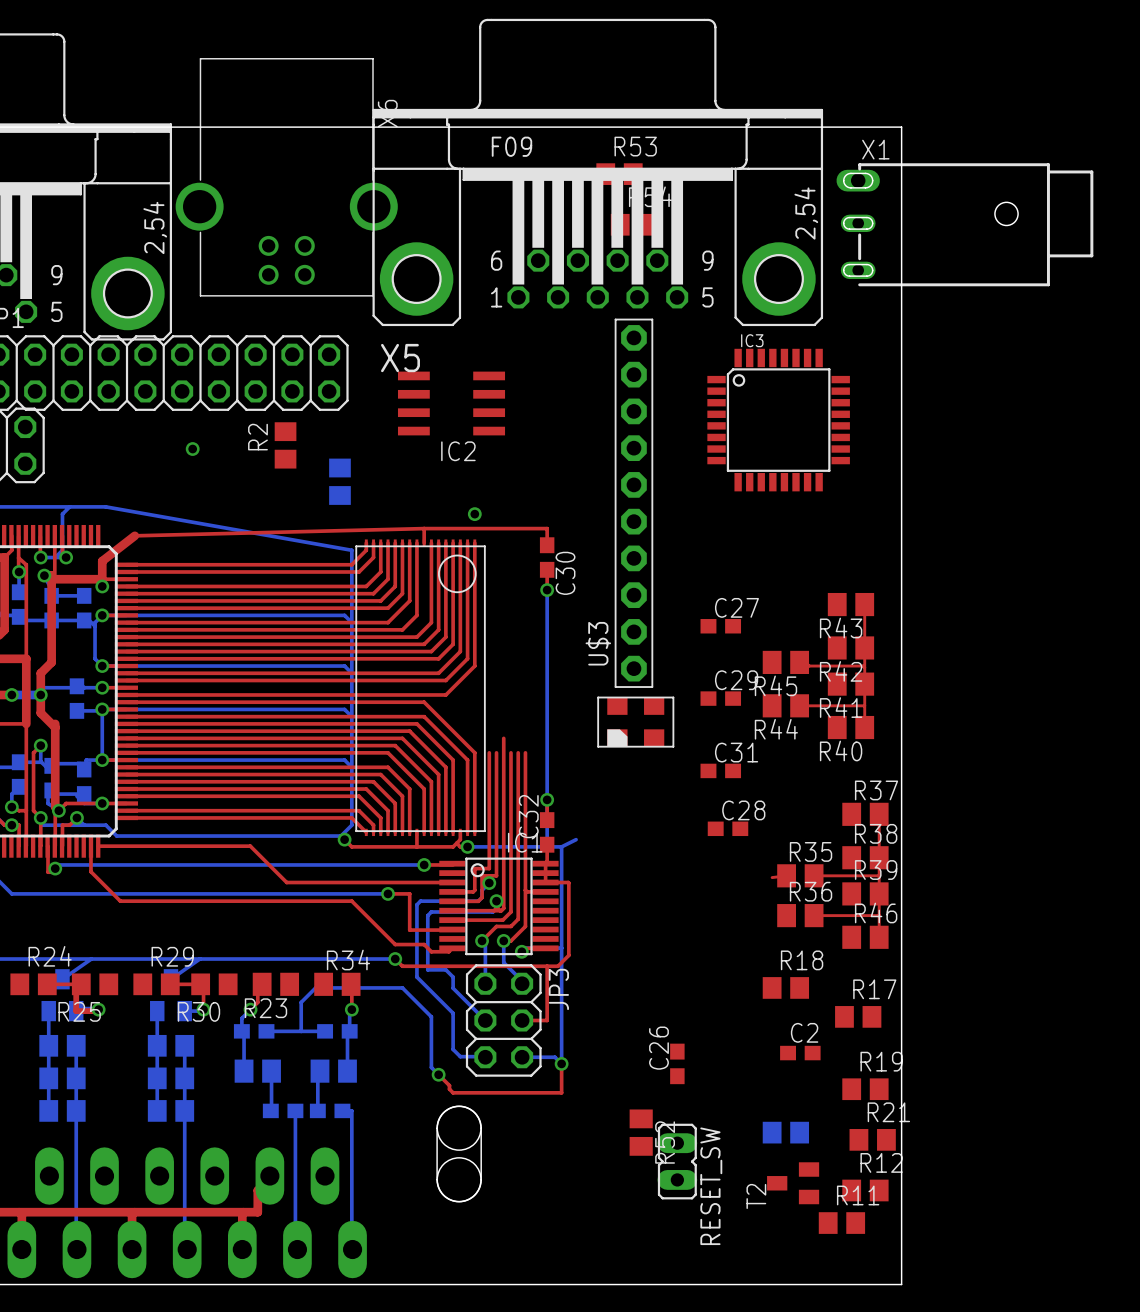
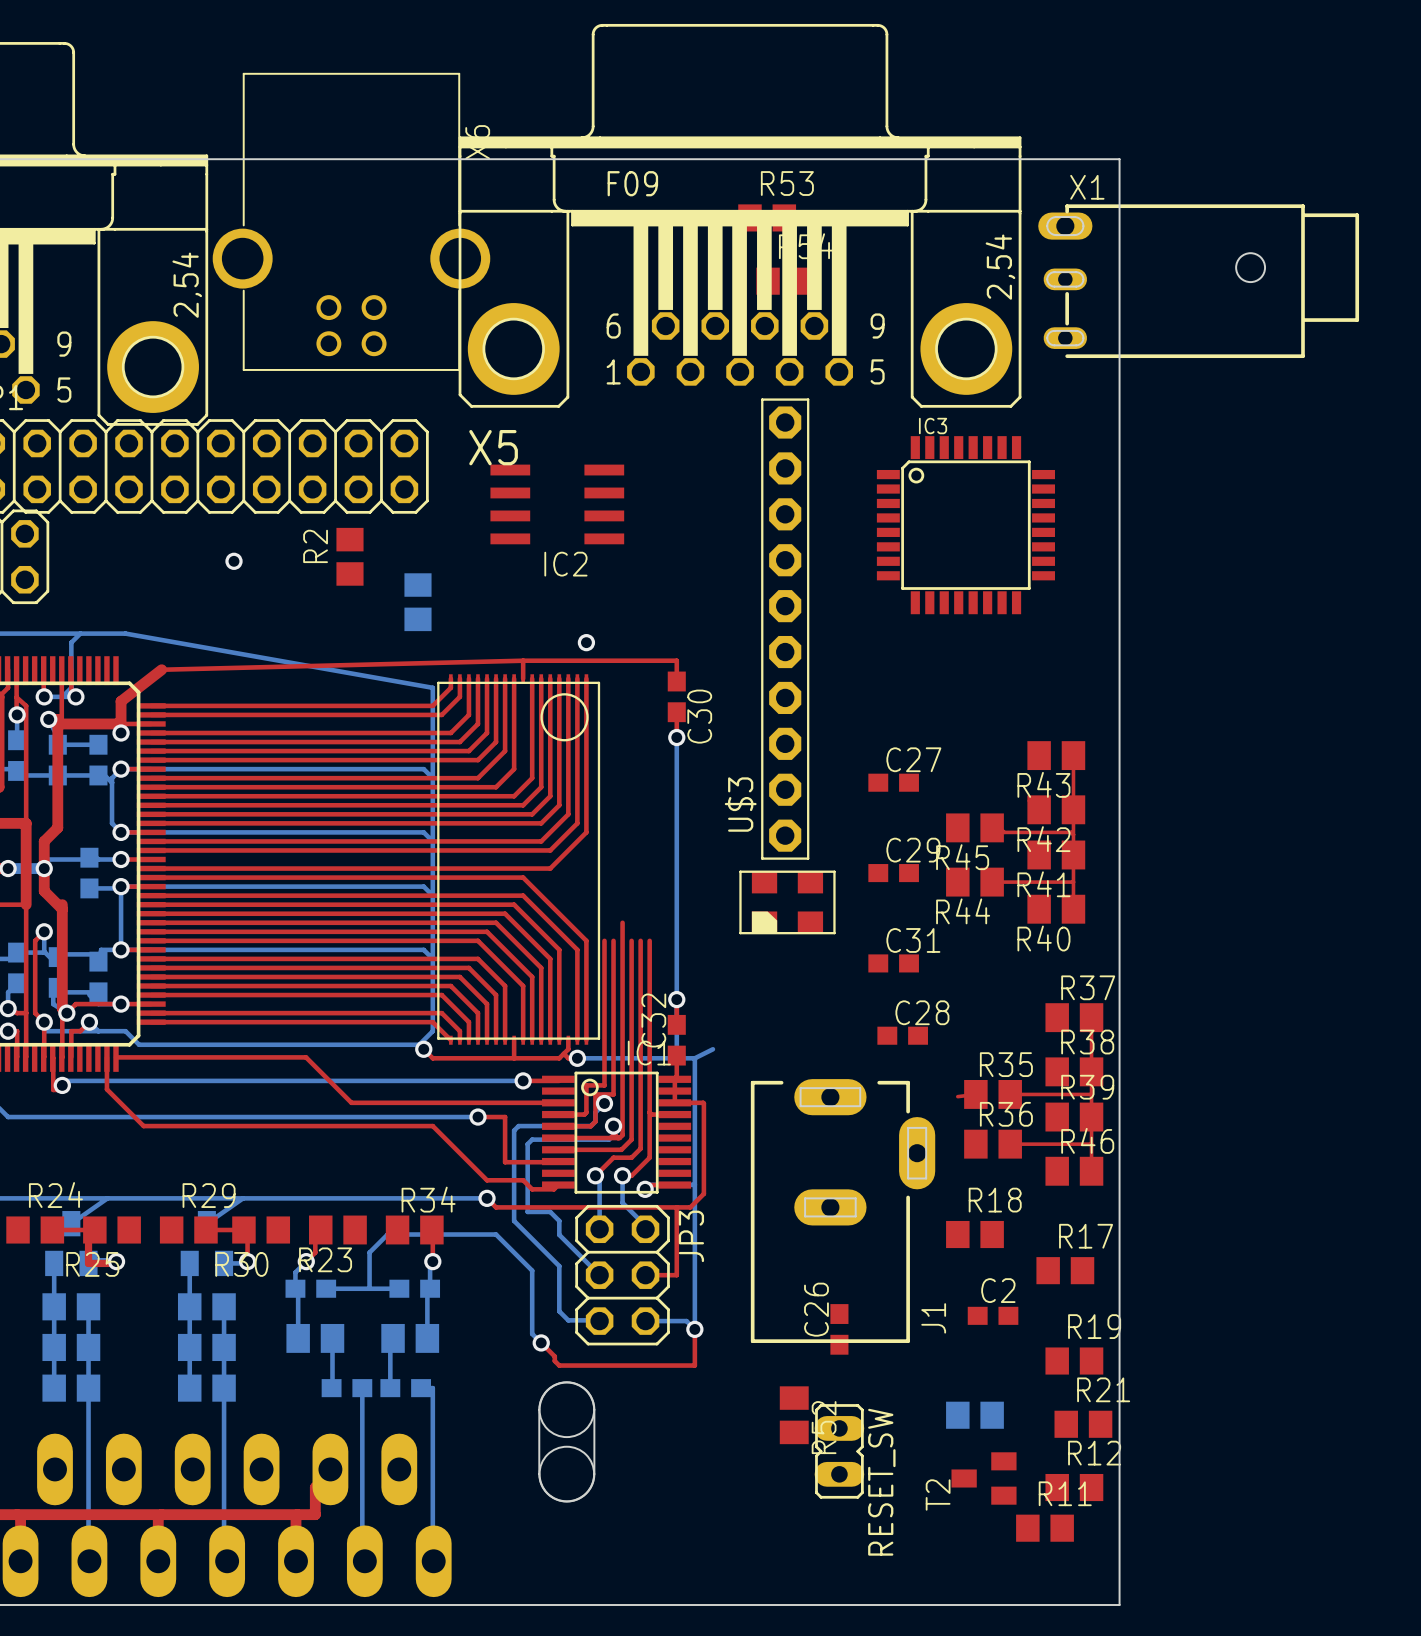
J1: none -> (843, 1211)

